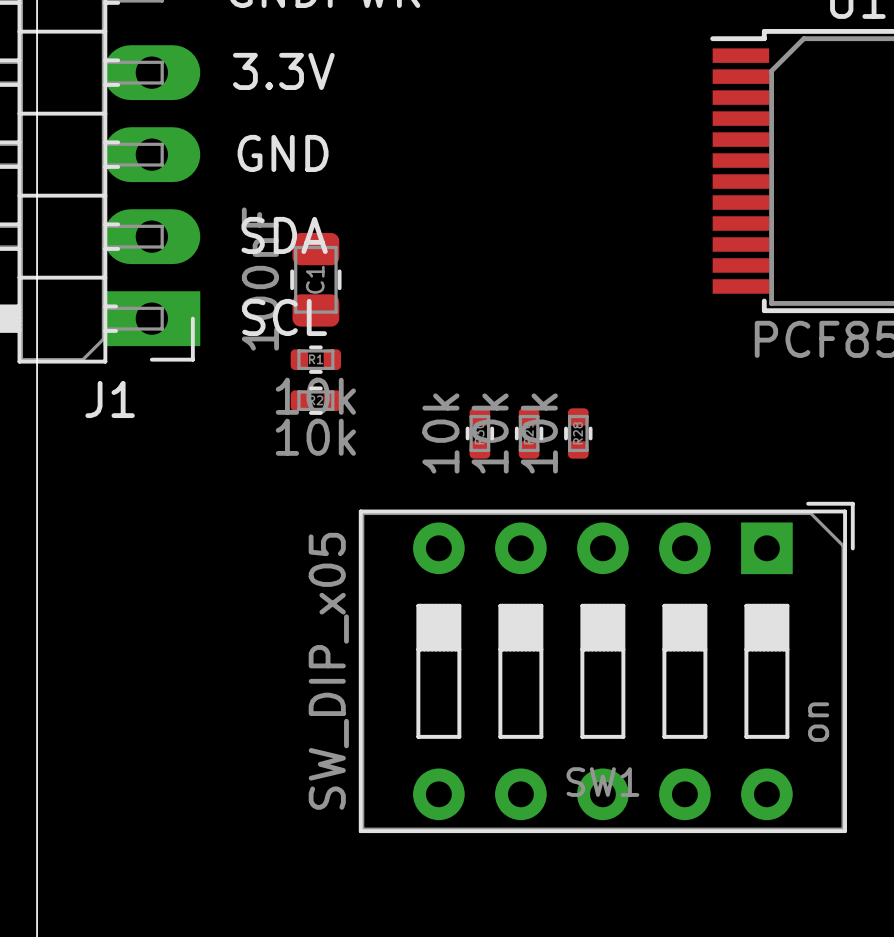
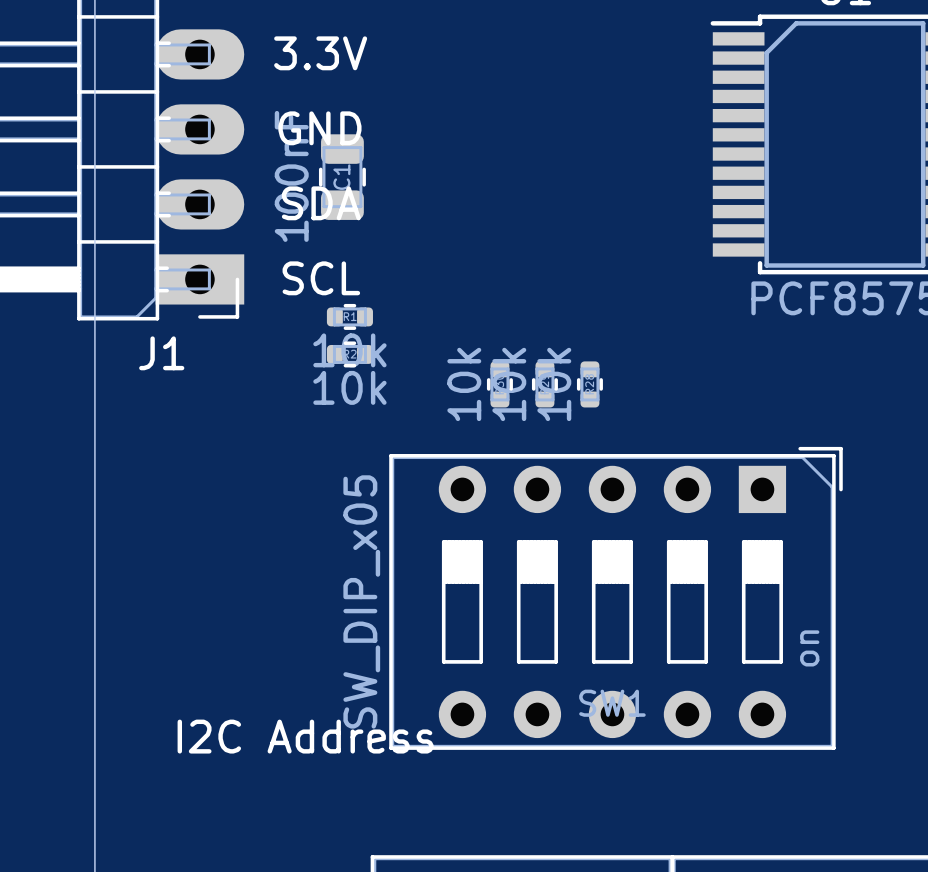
C1 position: (315, 279) -> (342, 177)
text: none -> I2C Address (305, 736)

